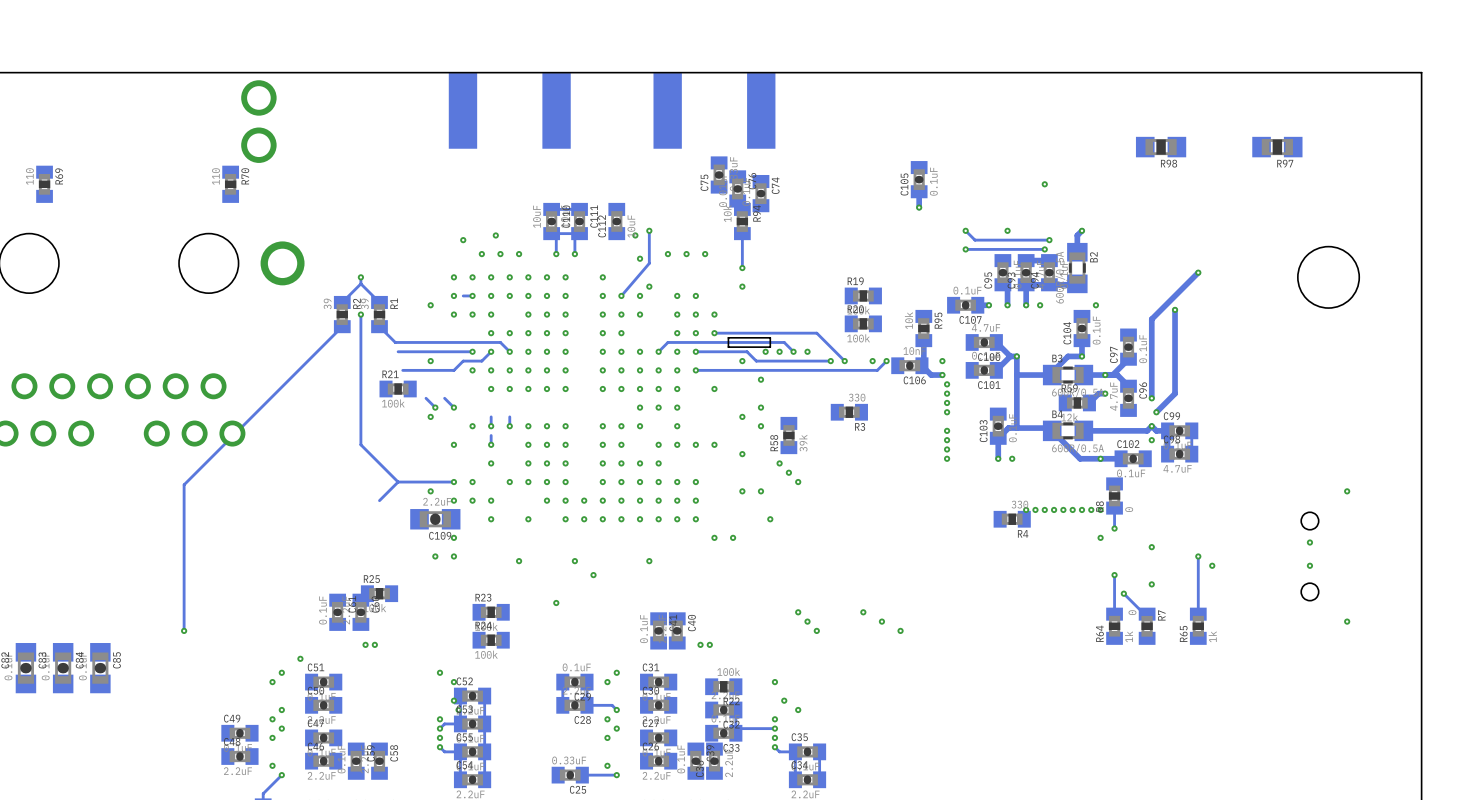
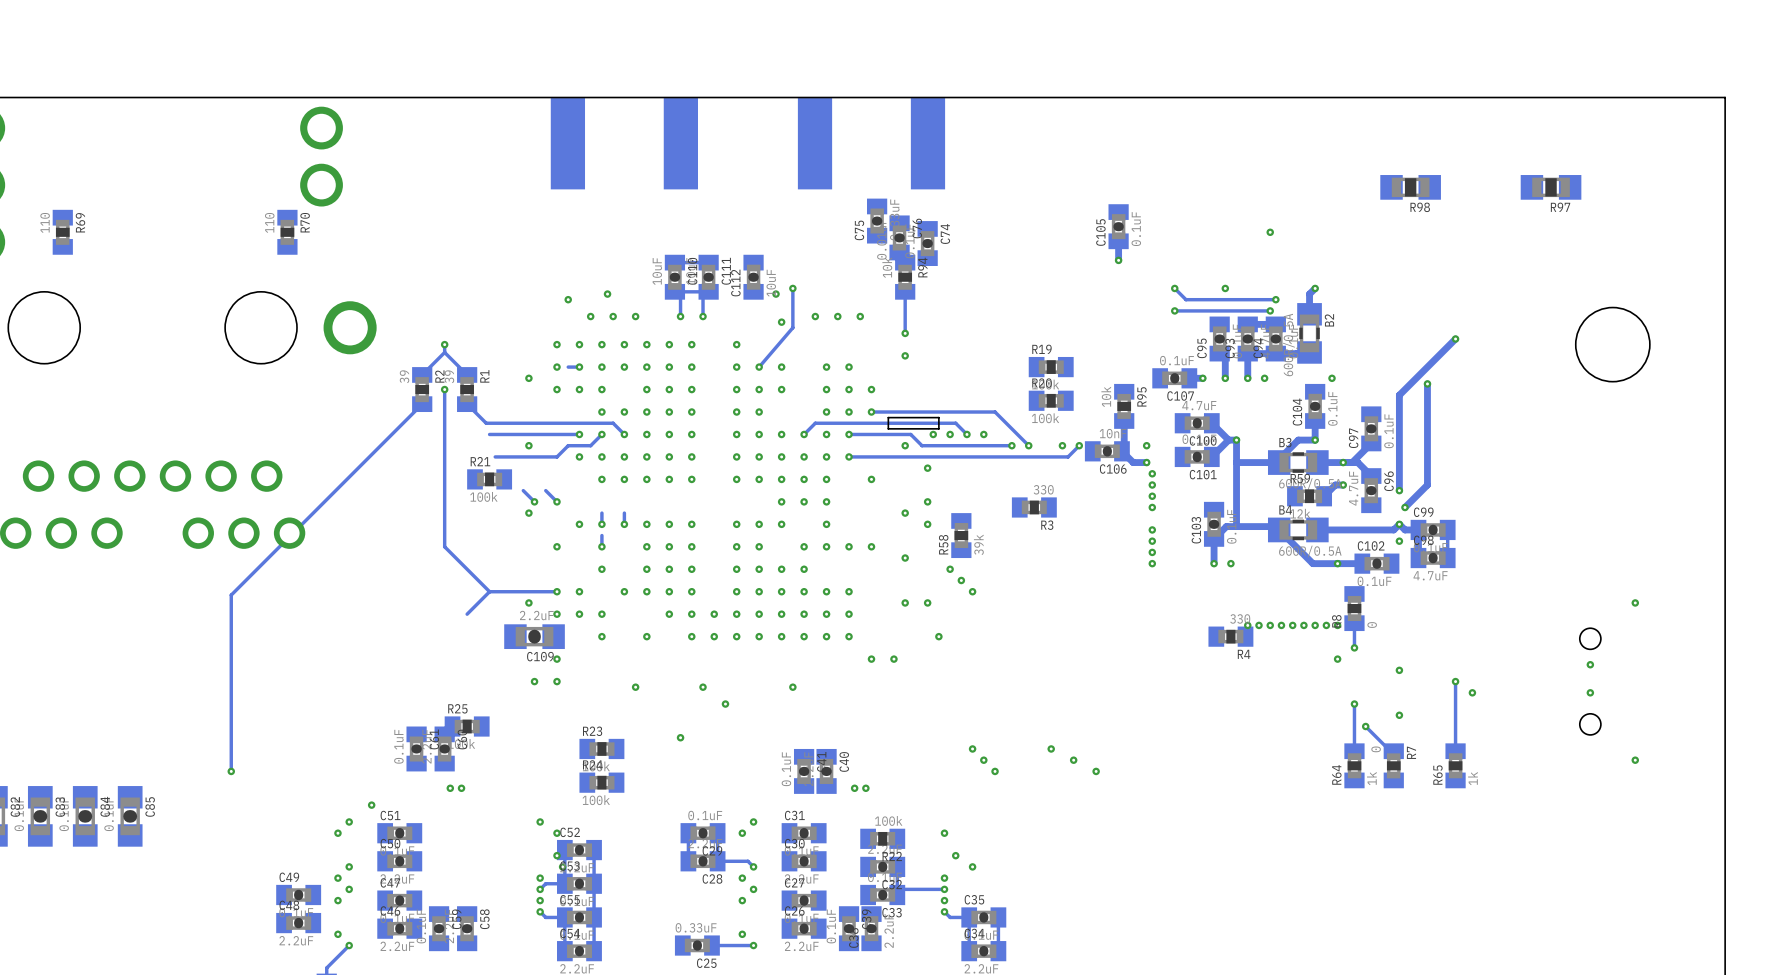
via: (649, 286) -> none

